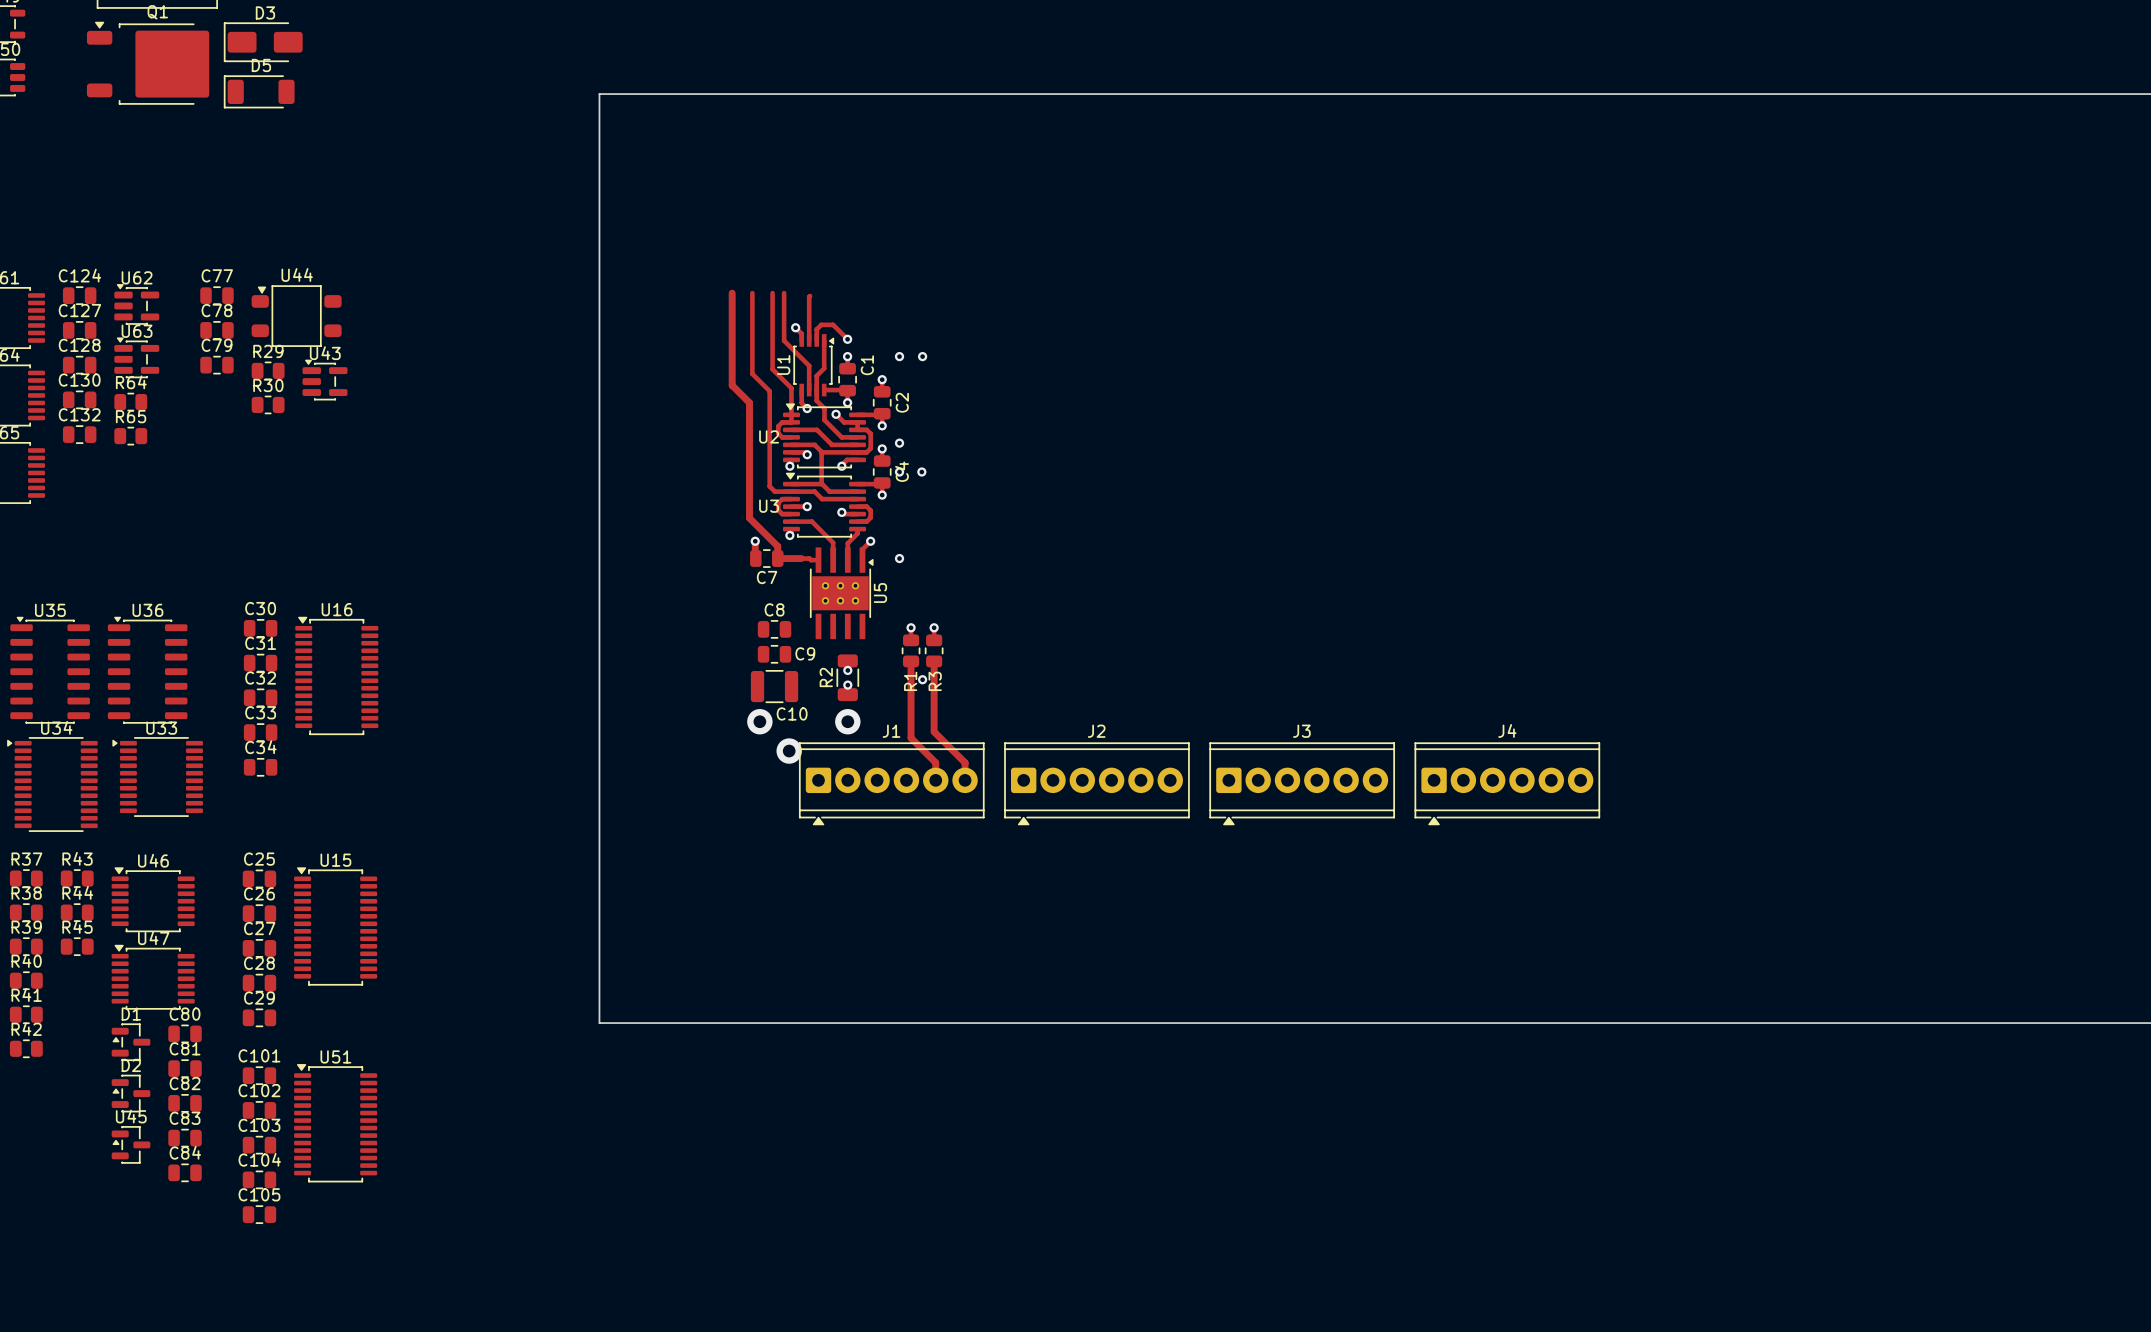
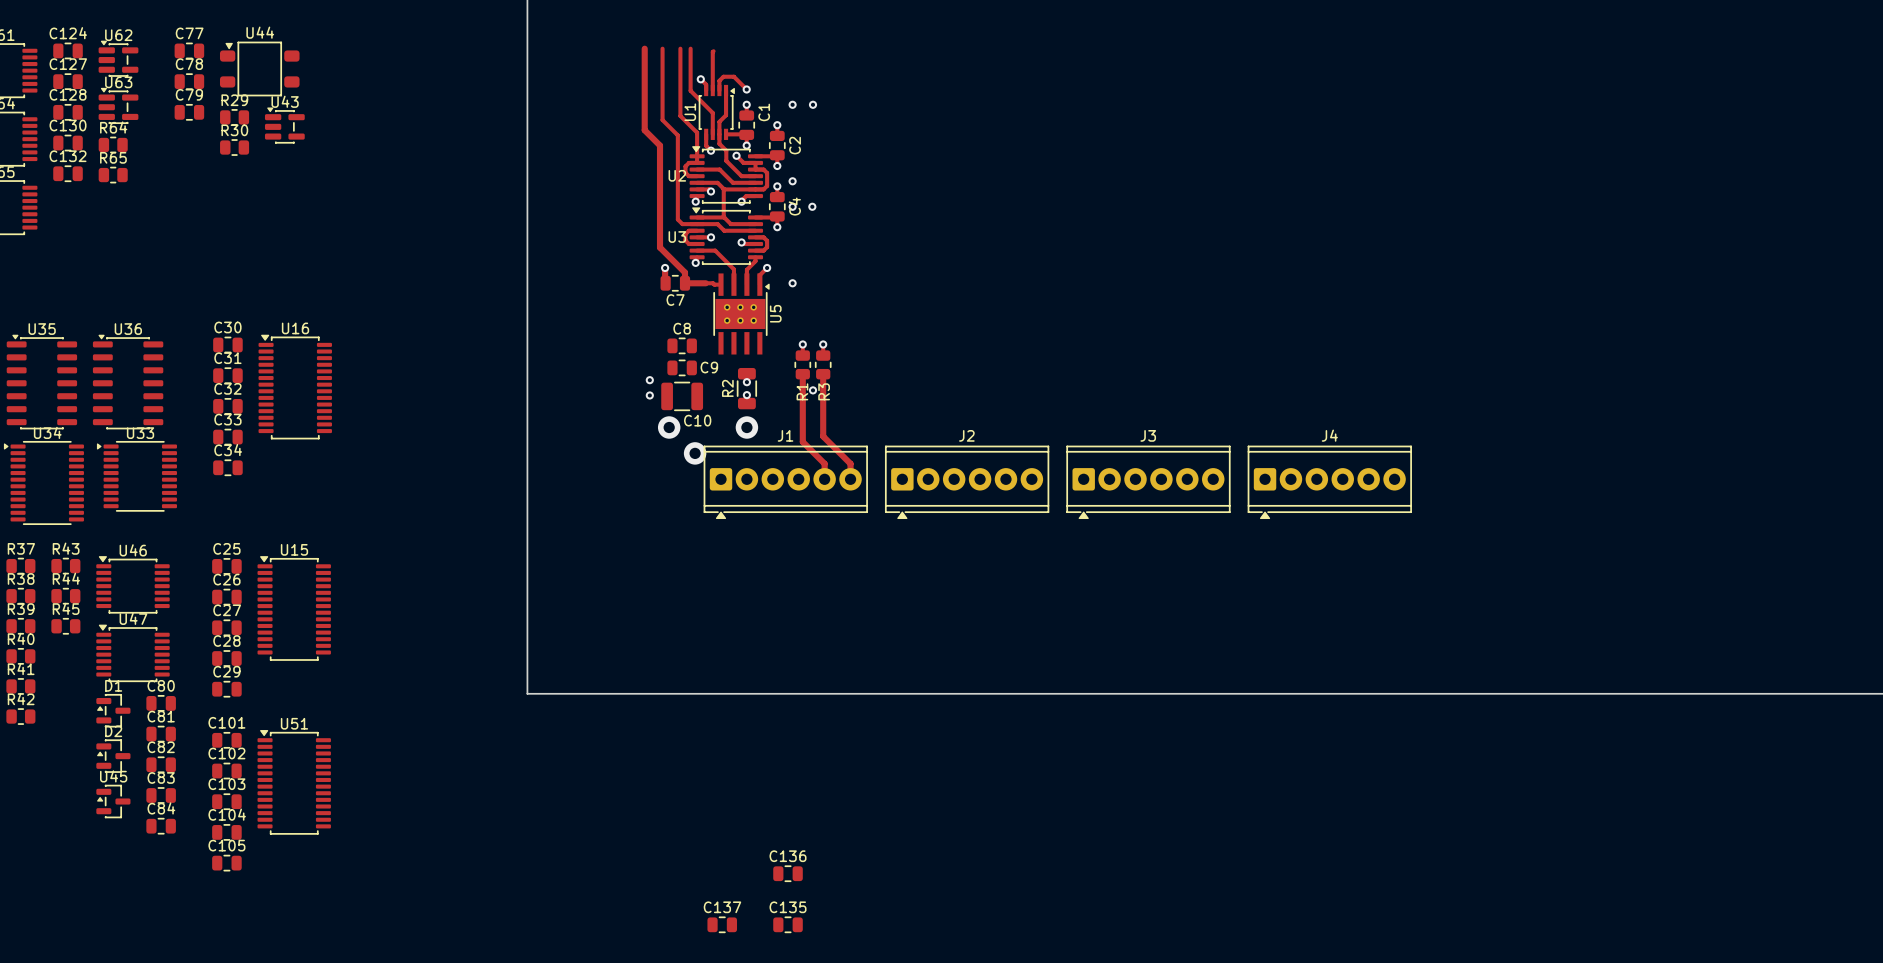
via: none -> (649, 380)
via: none -> (649, 395)
C136: none -> (788, 873)
C137: none -> (722, 924)
C135: none -> (788, 924)

